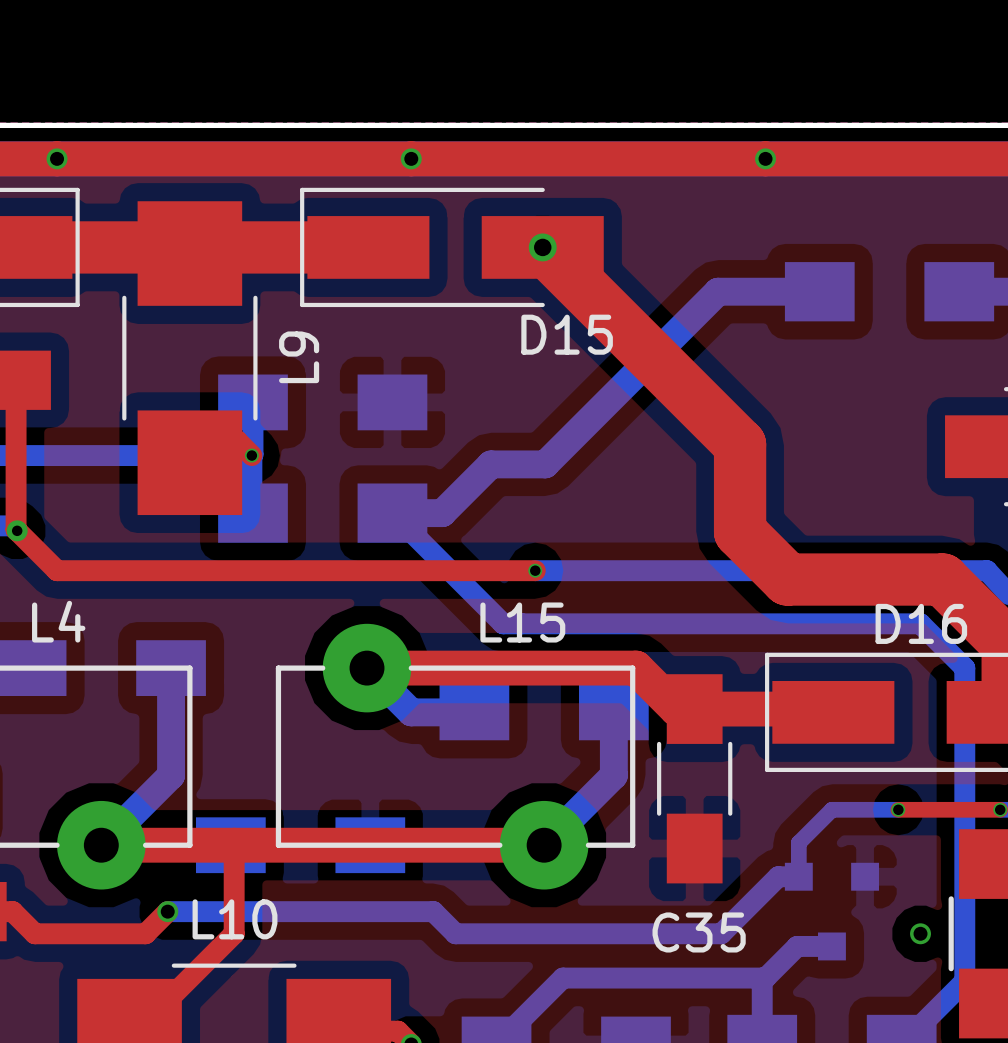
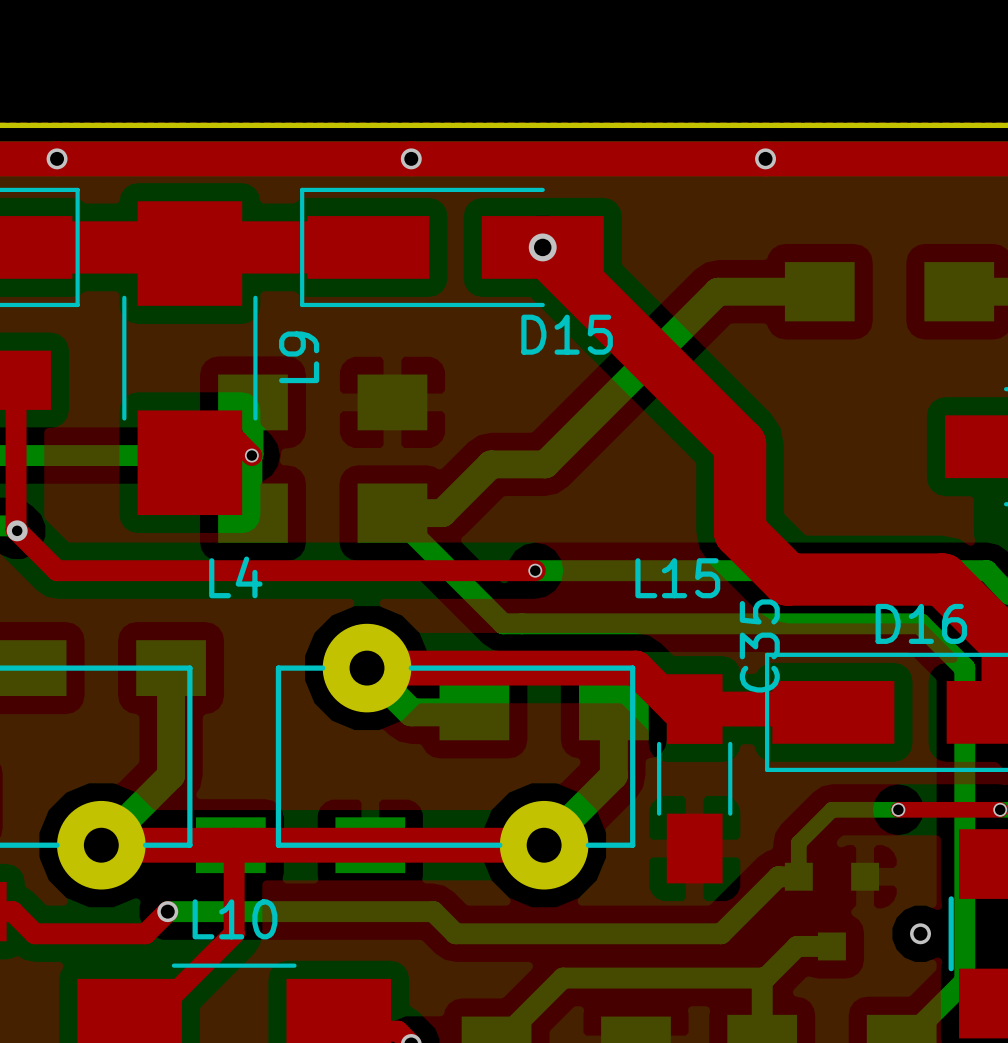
L4 name position: L4 (58, 621) -> L4 (235, 577)
L15 name position: L15 (522, 622) -> L15 (677, 578)
C35 name rotation: 0° (699, 932) -> 90° counterclockwise (759, 645)
C35 name position: C35 (699, 932) -> C35 (759, 645)

